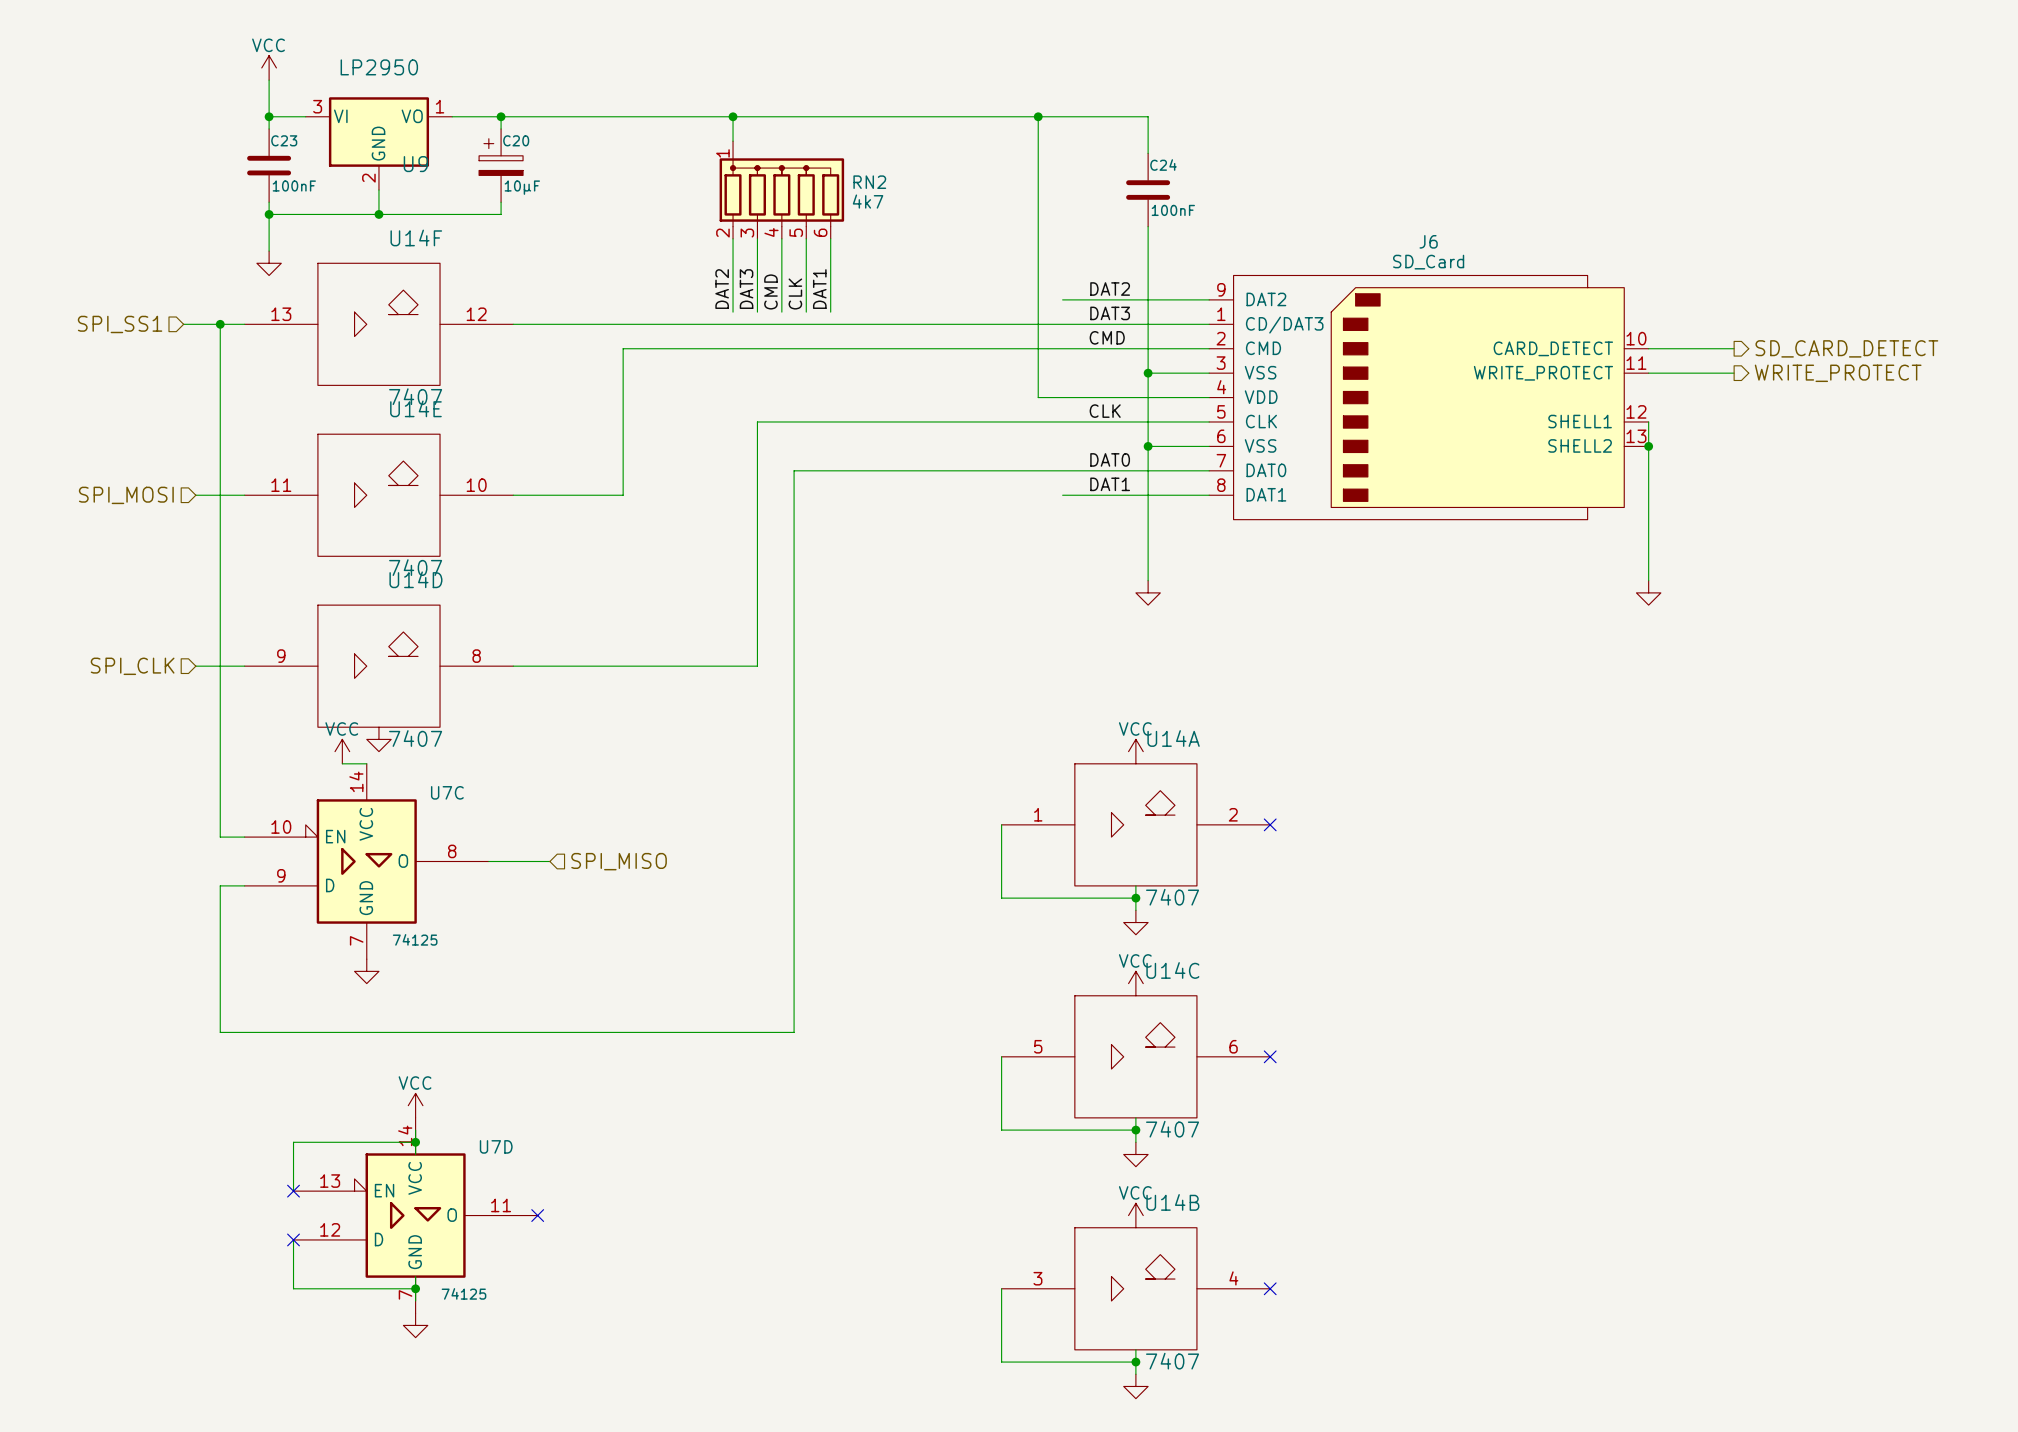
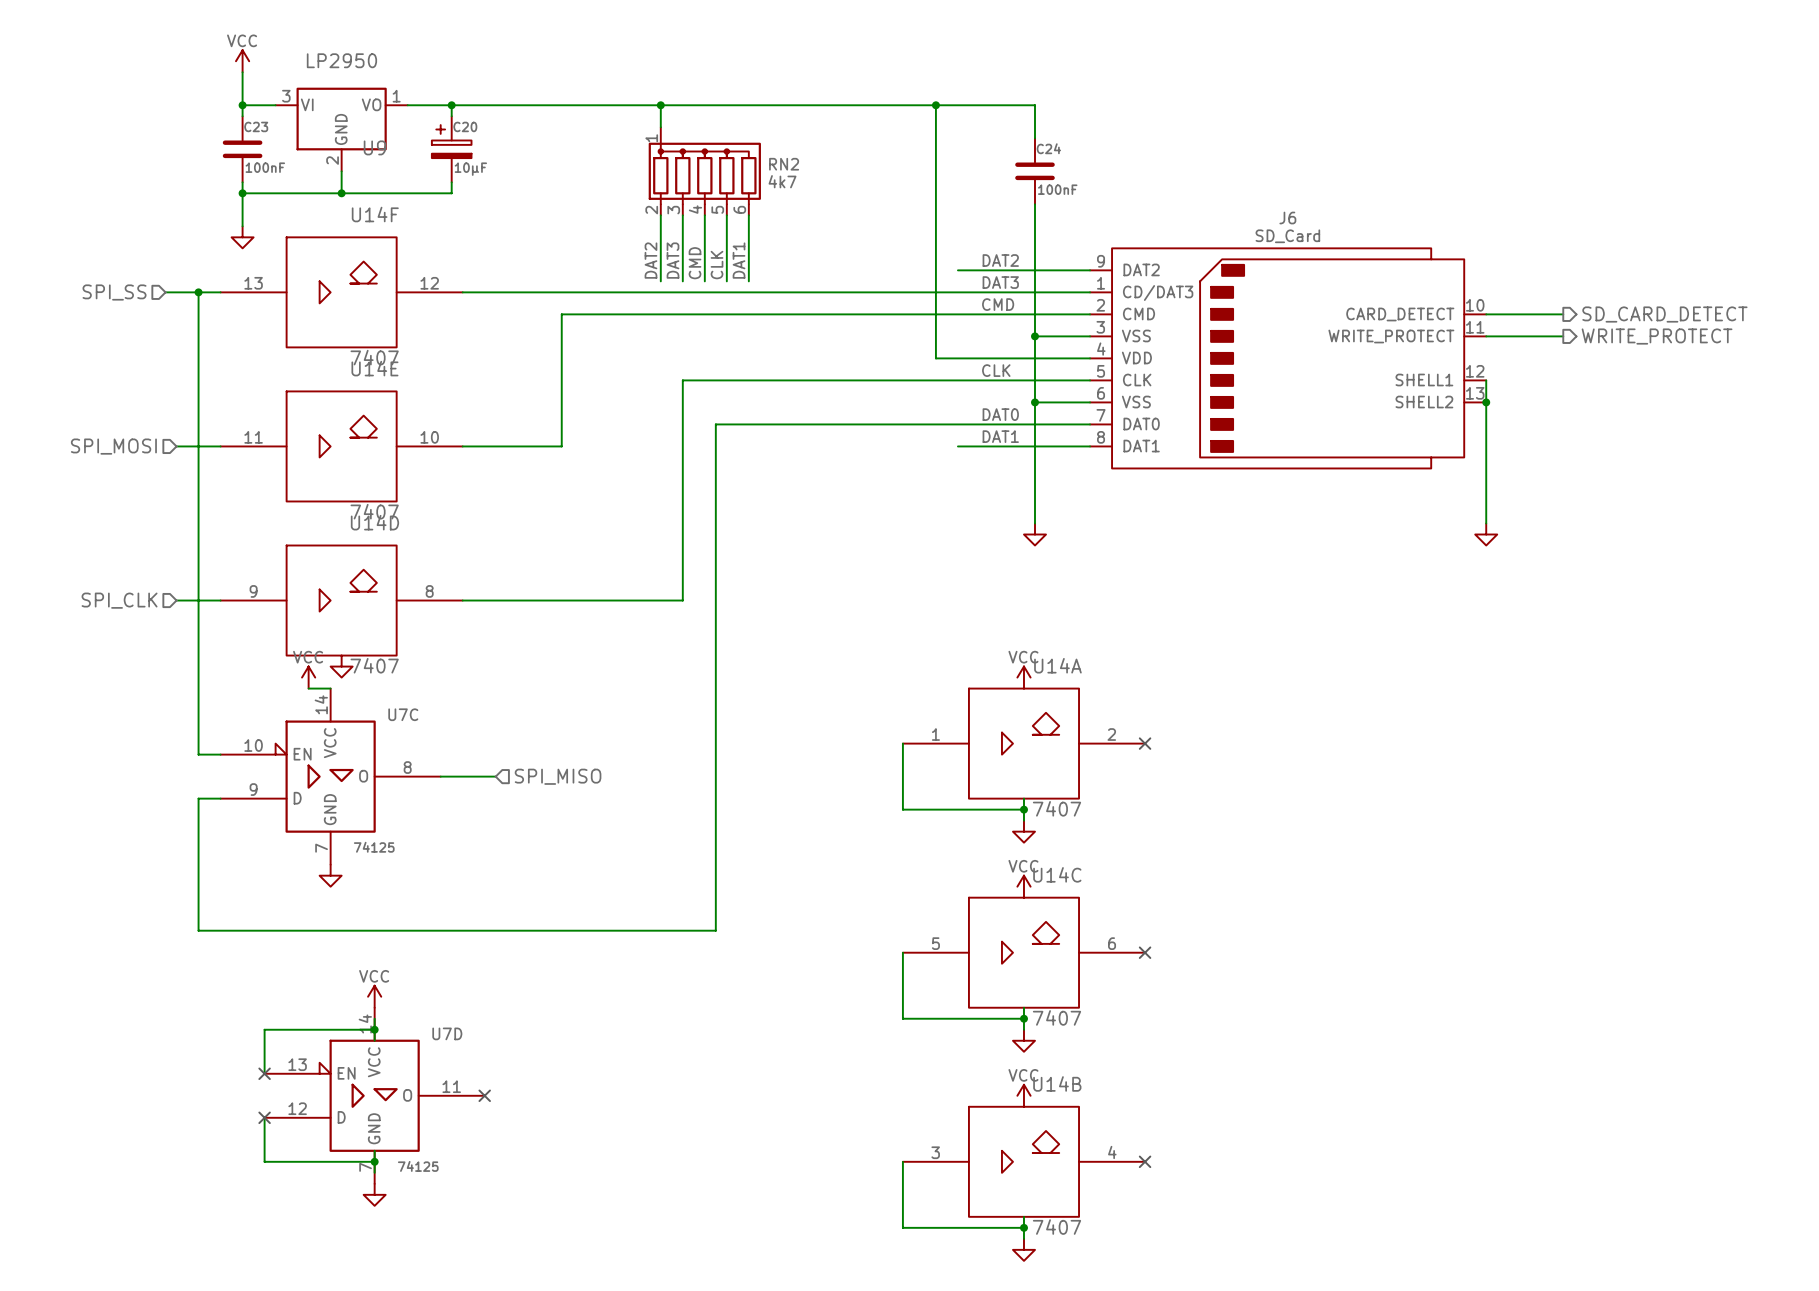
hierarchical label: SPI_SS1 (120, 324) -> SPI_SS (114, 292)

